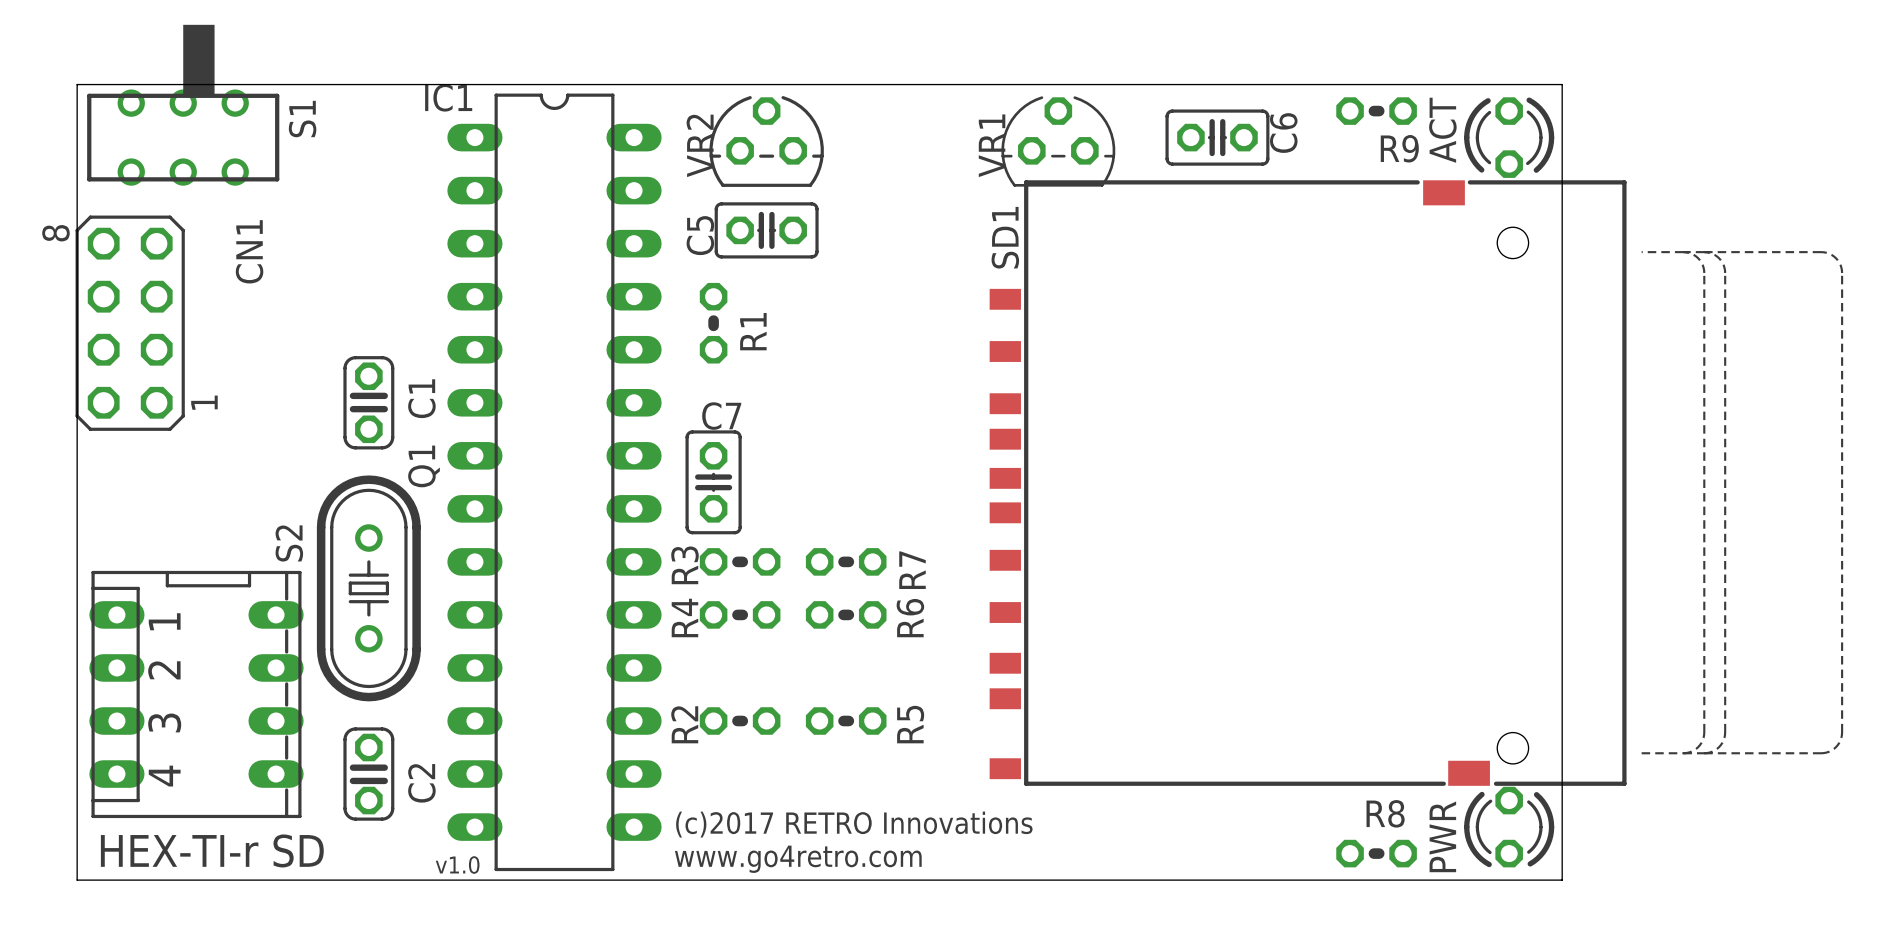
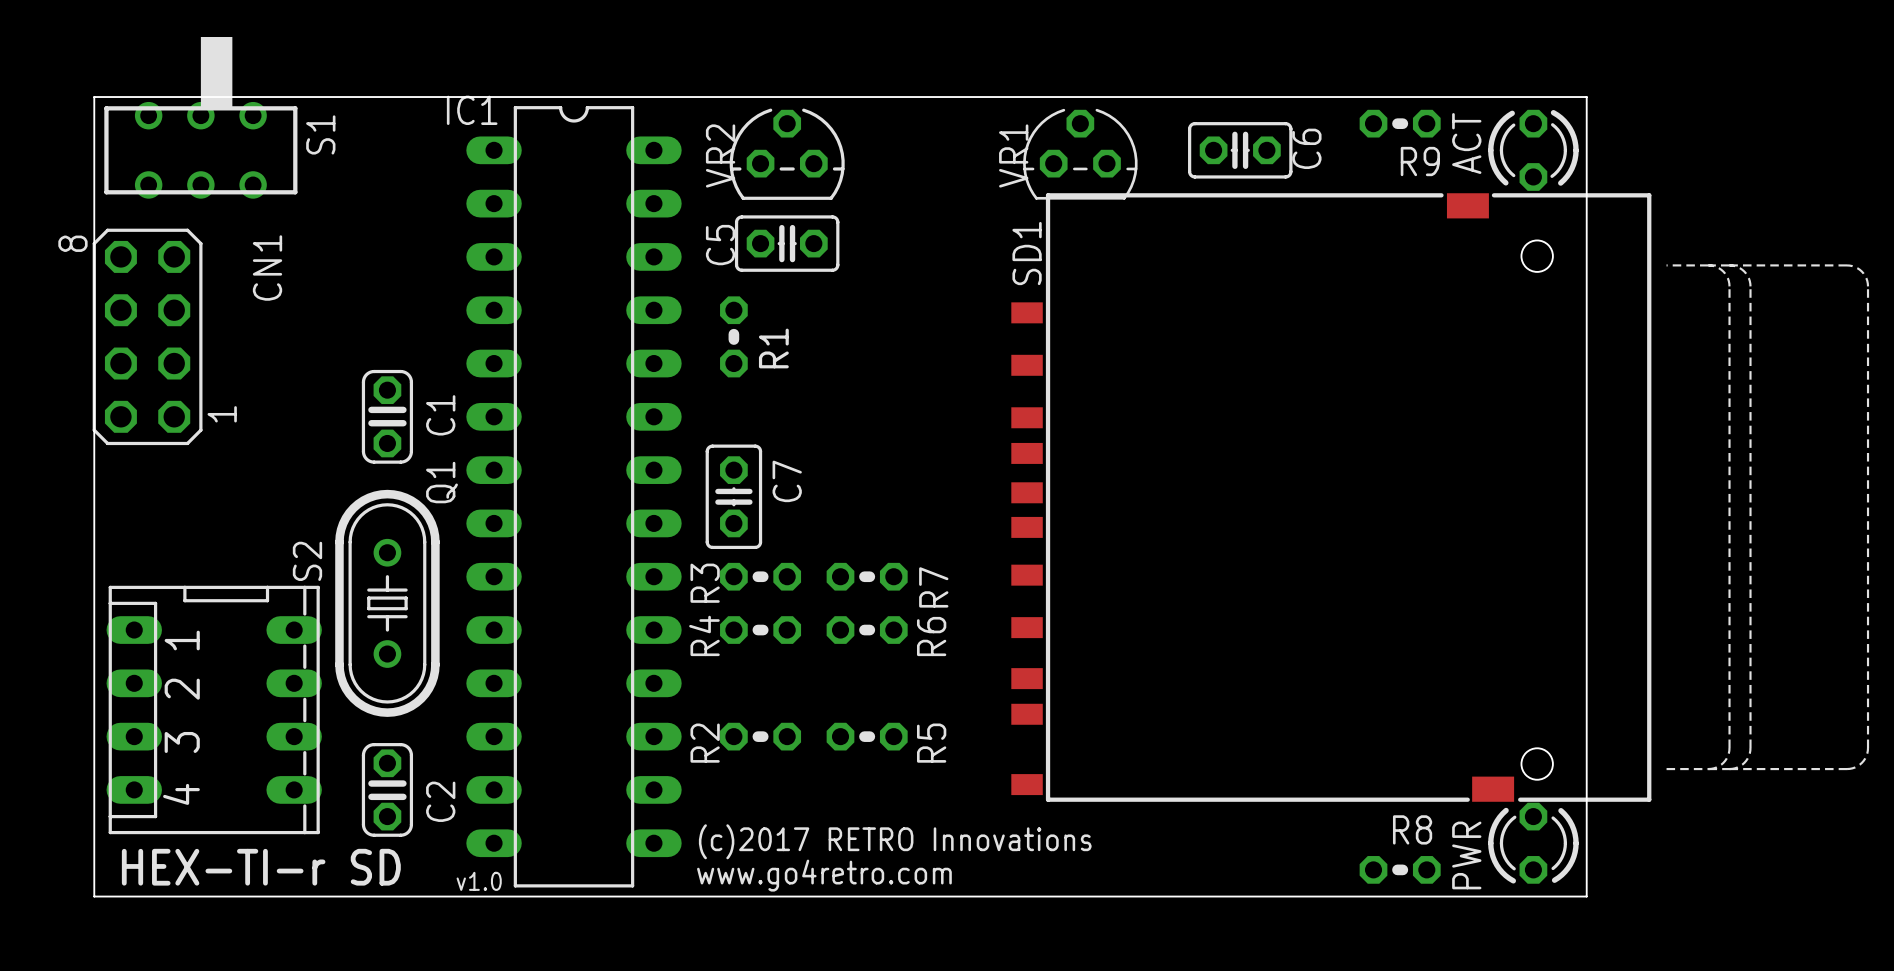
C7 name rotation: 0° (721, 416) -> 90° counterclockwise (787, 481)
C7 name position: C7 (721, 416) -> C7 (787, 481)

